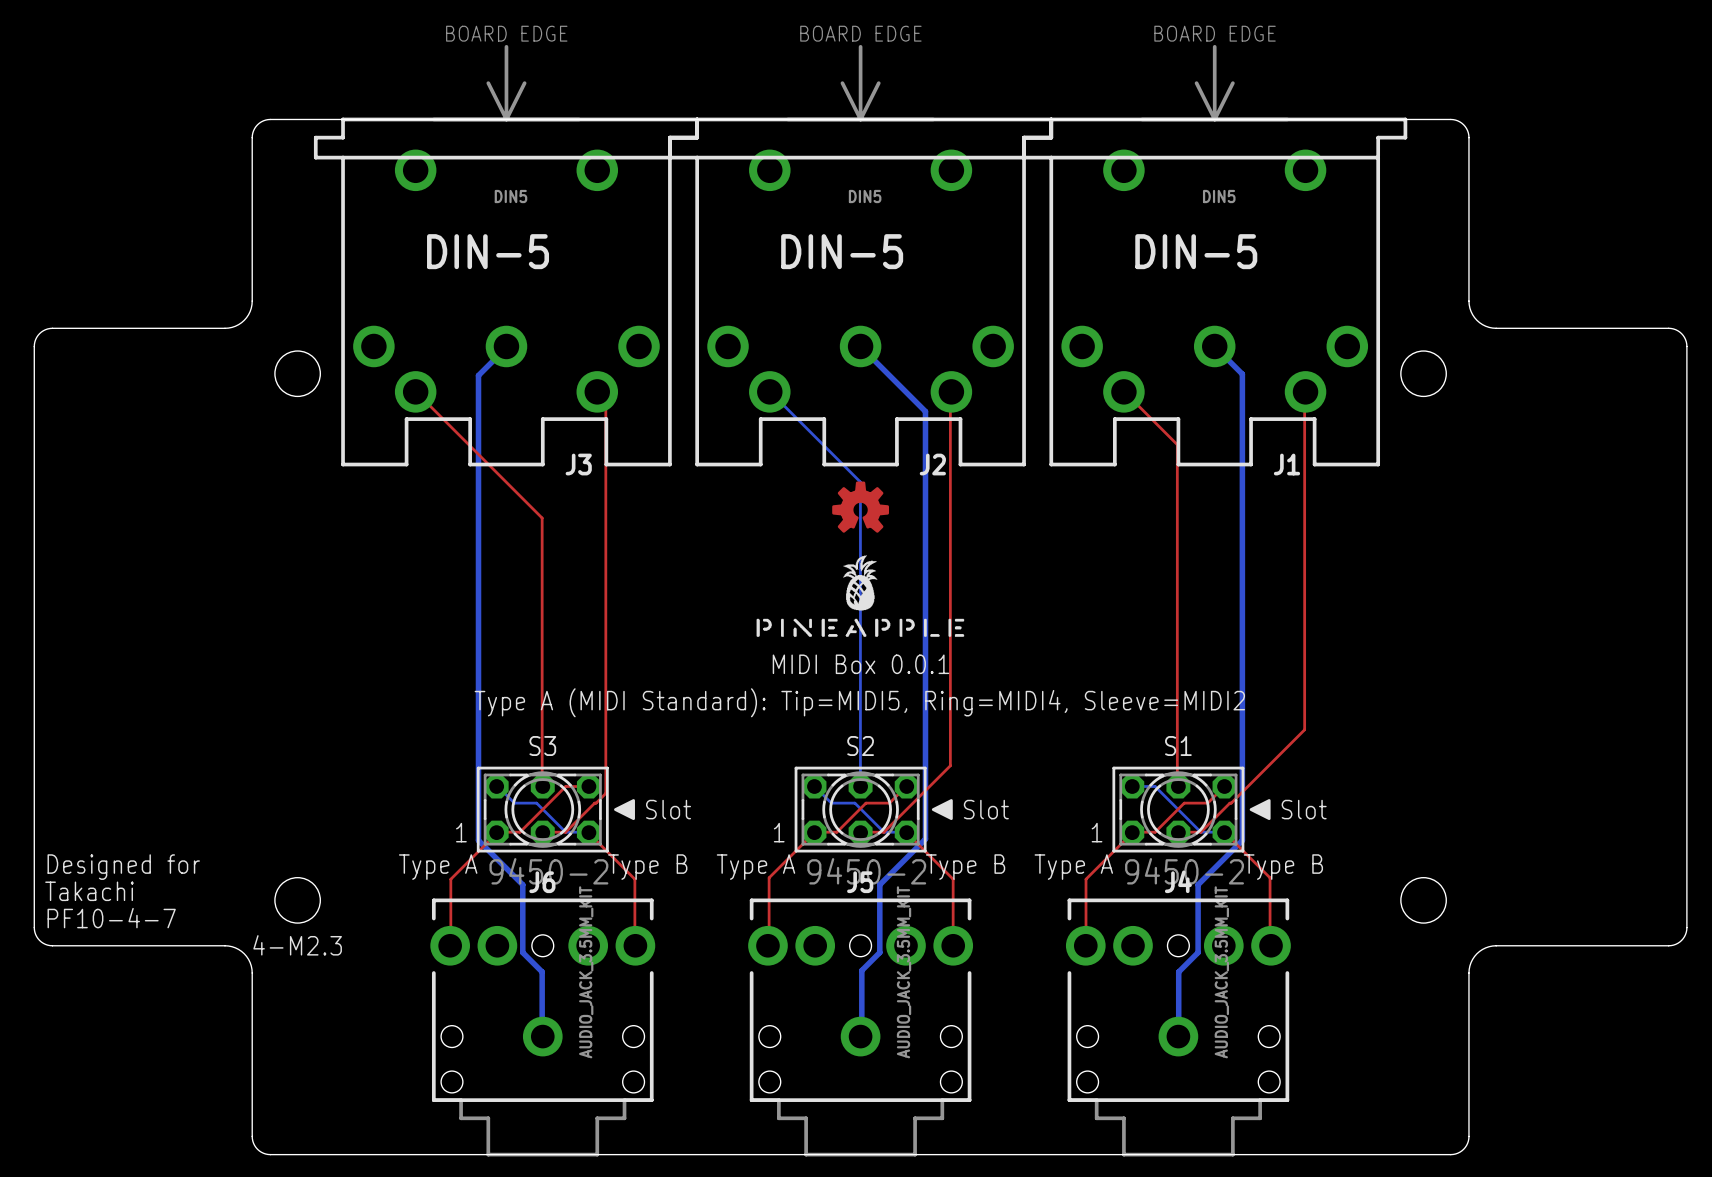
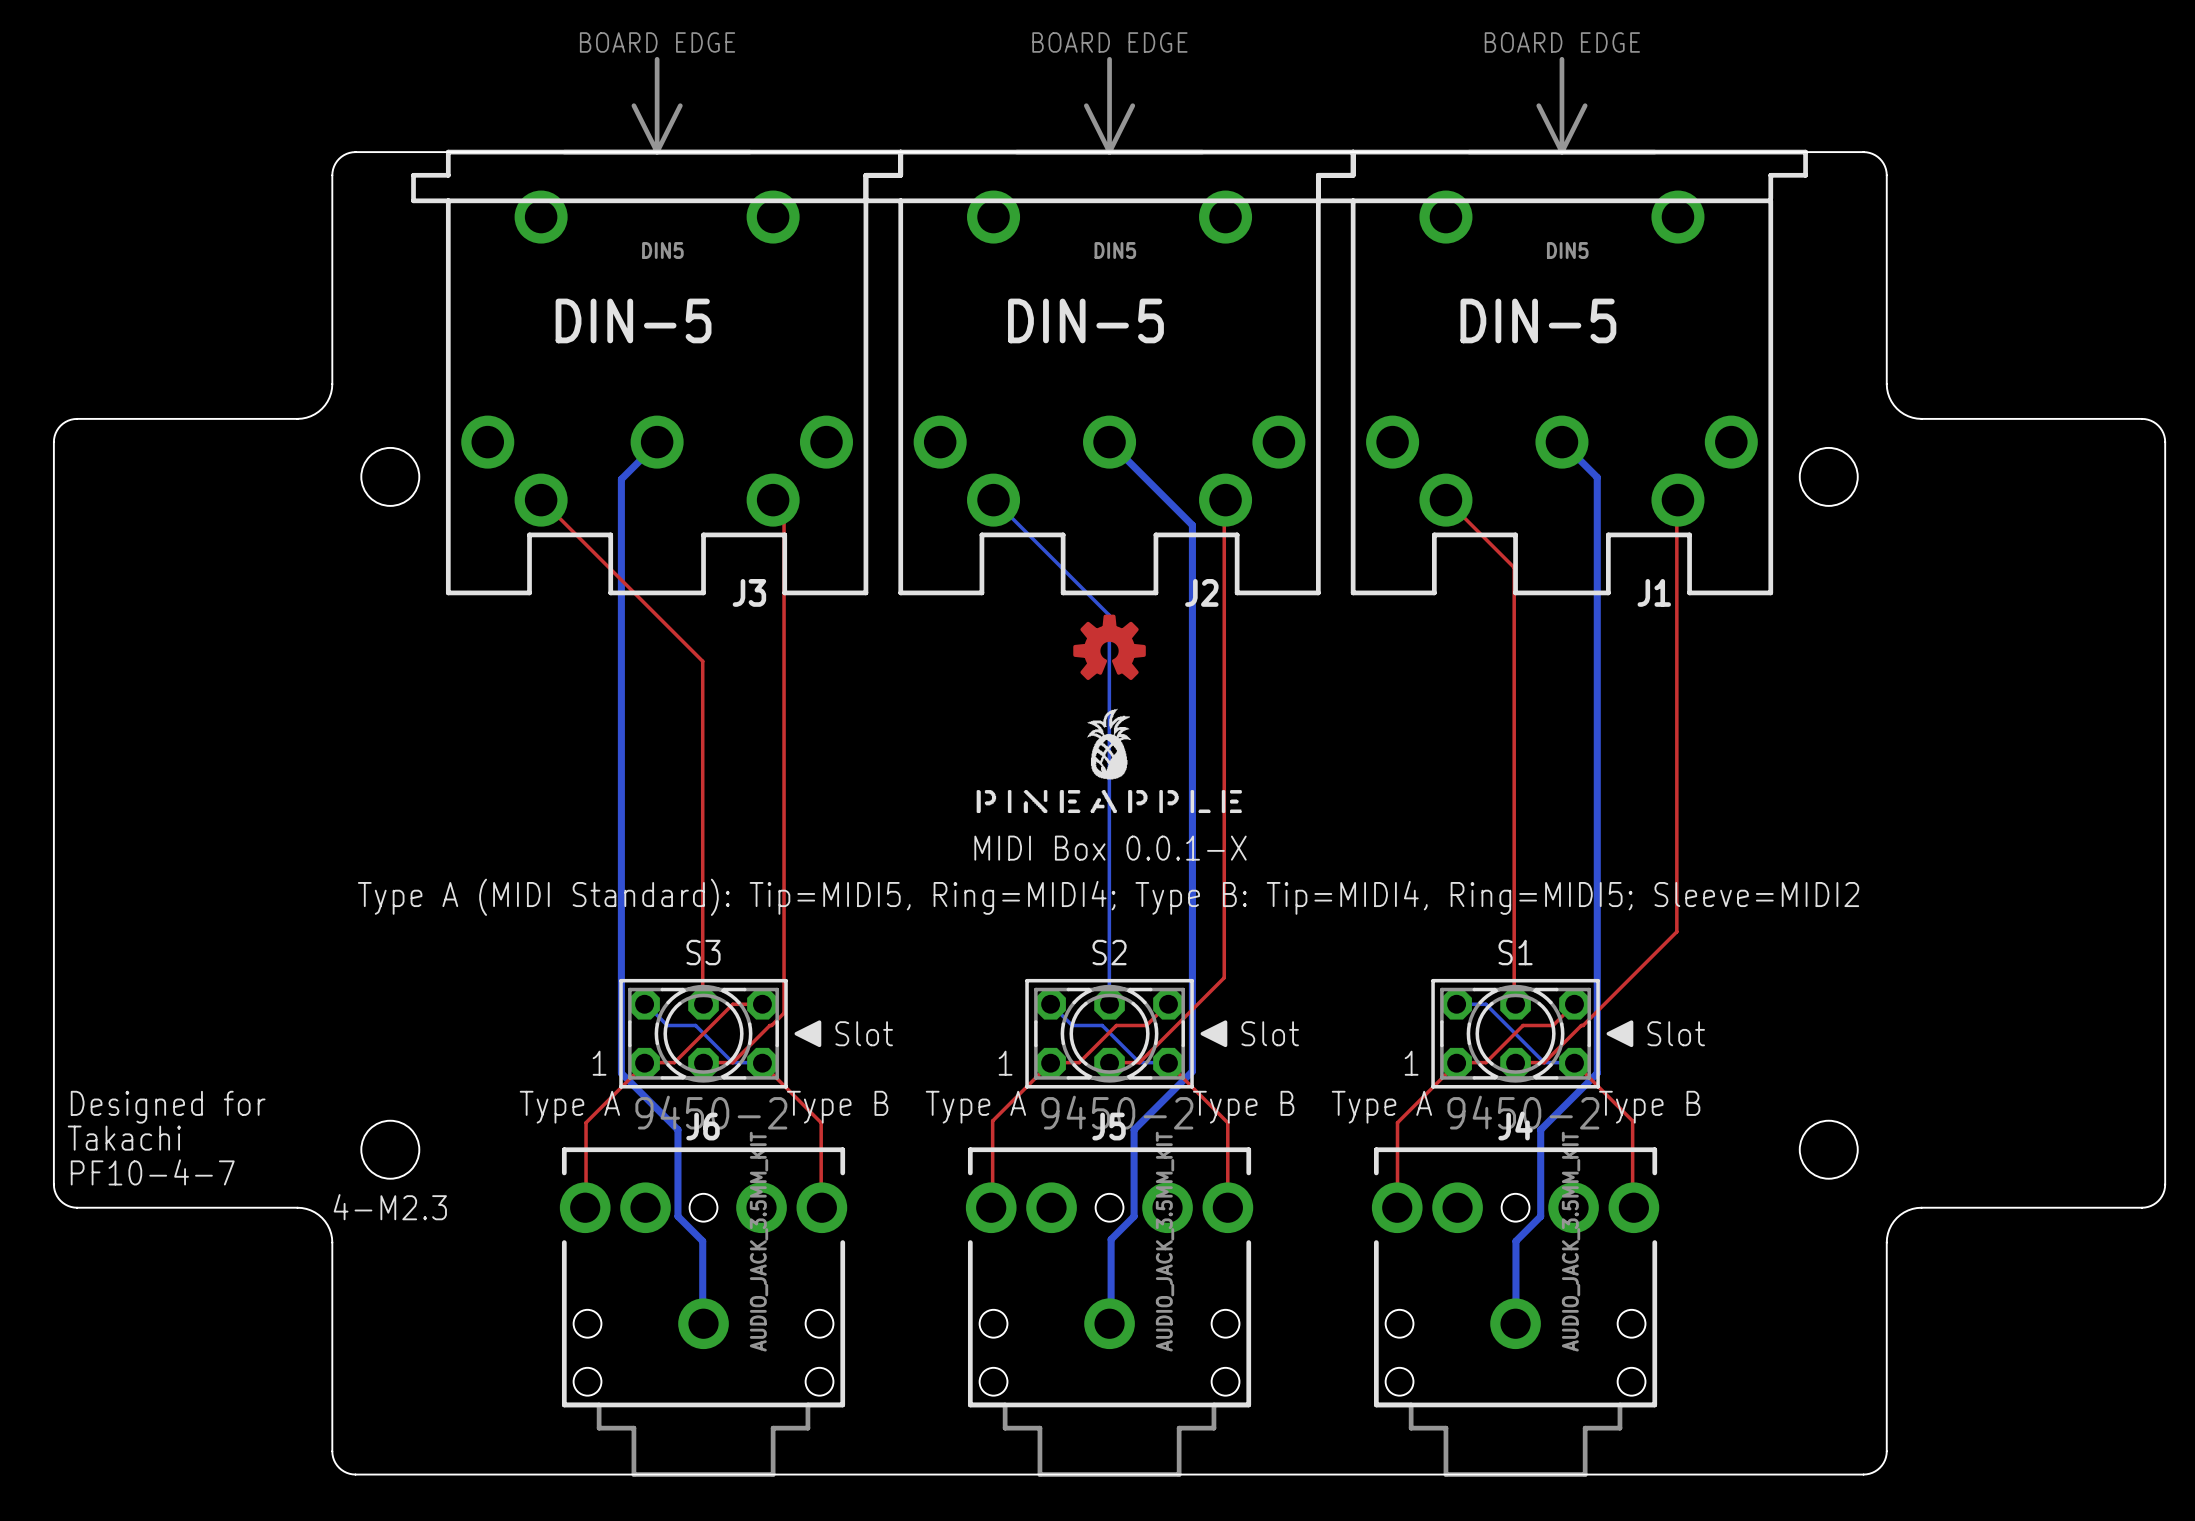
text: MIDI Box 0.0.1 (860, 664) -> MIDI Box 0.0.1-X (1110, 848)
text: Type A (MIDI Standard): Tip=MIDI5, Ring=MIDI4, Sleeve=MIDI2 (859, 702) -> Type A (MIDI Standard): Tip=MIDI5, Ring=MIDI4; Type B: Tip=MIDI4, Ring=MIDI5; Sleeve=MIDI2 (1108, 897)

